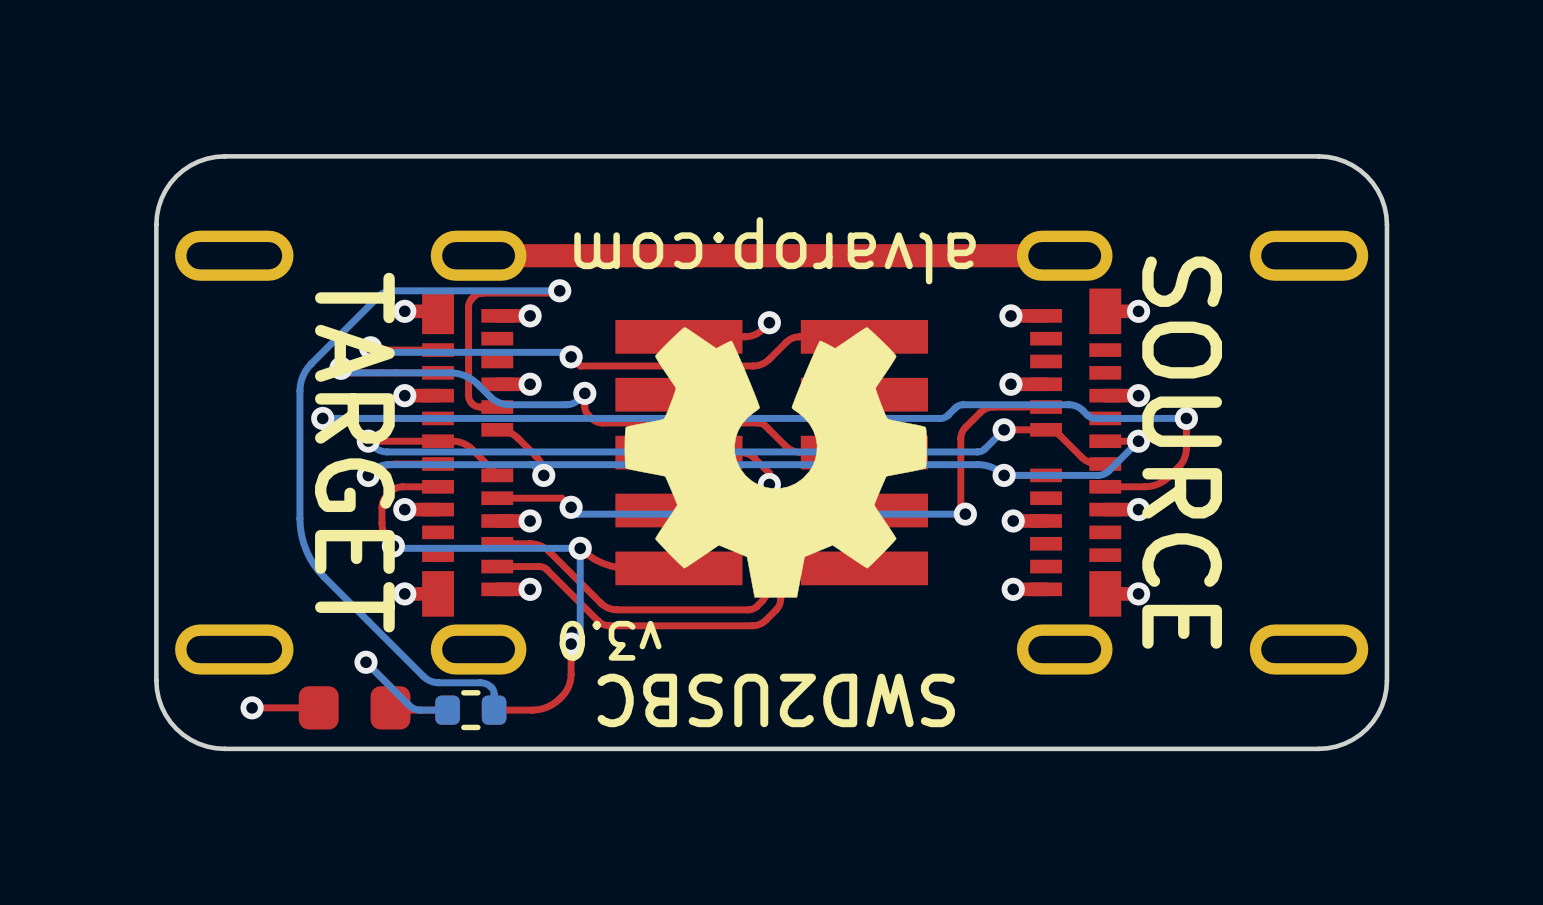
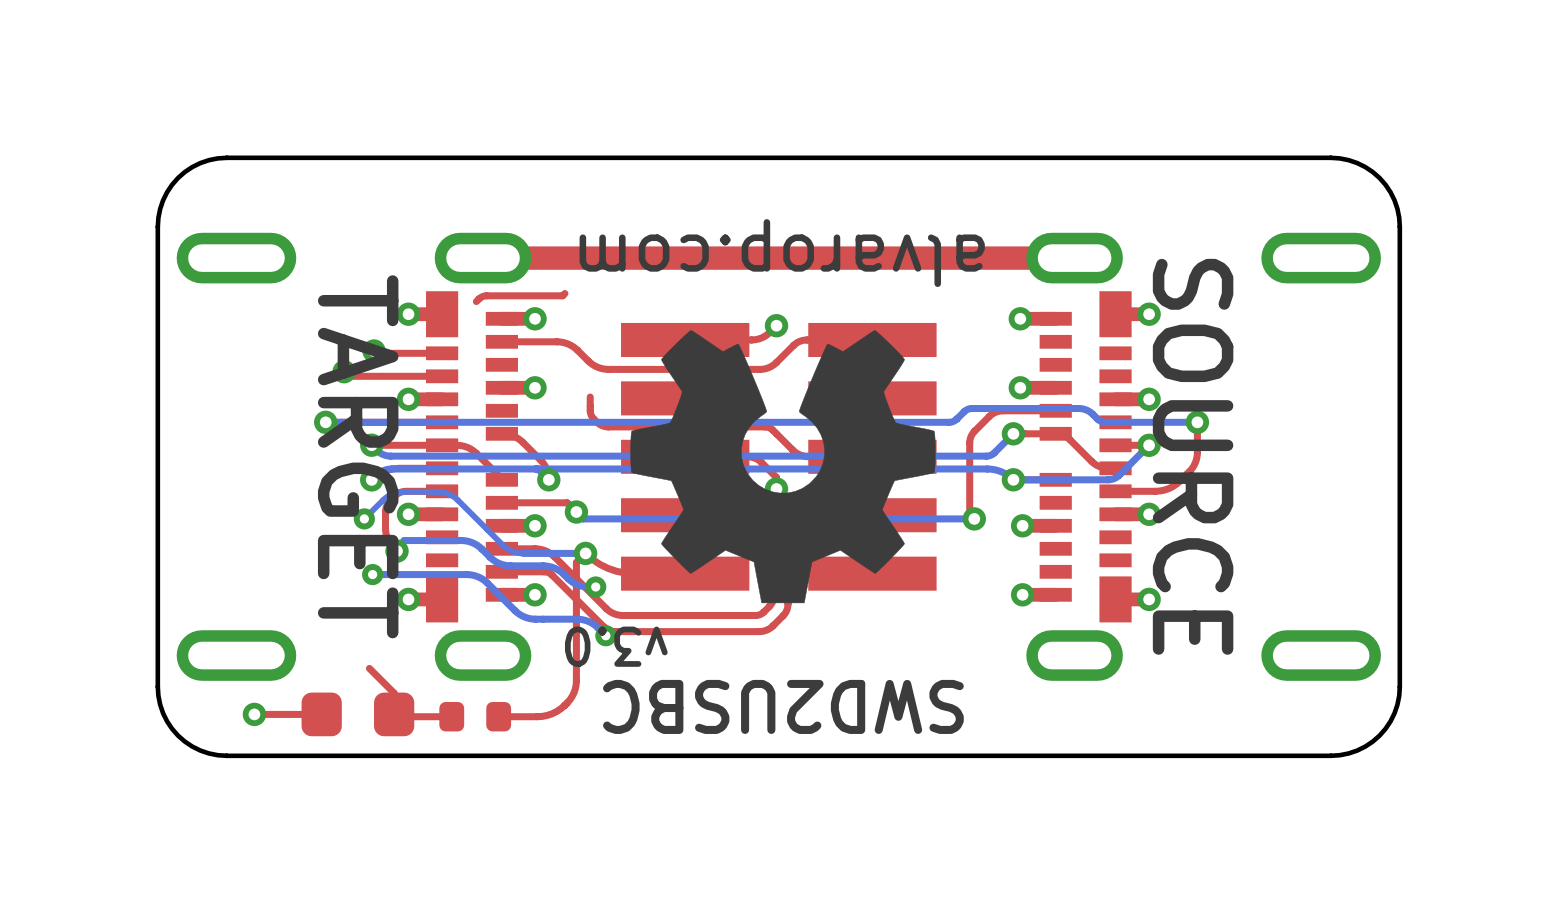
bottom track: (559, 290) (384, 292) (311, 363) (305, 371) (300, 386) (300, 526) (303, 542) (309, 557) (324, 577) (425, 678) (436, 682) (486, 683) (493, 691) (494, 710) -> none
via: (559, 290) -> none
top track: (471, 298) (468, 306) (468, 398) (471, 403) (477, 406) (497, 407) -> none
bottom track: (370, 347) (375, 352) (566, 352) (571, 356) -> none
top track: (571, 356) (580, 366) (603, 366) -> (501, 341) (565, 343) (575, 348) (592, 364) (608, 369)
via: (571, 356) -> none
bottom track: (340, 368) (351, 372) (457, 373) (471, 379) (492, 399) (505, 404) (568, 404) (576, 401) (584, 393) -> none
via: (584, 393) -> none
via: none -> (364, 518)
bottom track: none -> (398, 546) (404, 540) (466, 541) (477, 545) (492, 559) (502, 564) (548, 566) (559, 570) (577, 584) (595, 586)
bottom track: (393, 546) (395, 548) (518, 548) -> (364, 518) (385, 498) (395, 493) (443, 492) (455, 498) (504, 546) (512, 551) (523, 553)
top track: none -> (585, 553) (576, 562) (576, 650)
bottom track: (580, 548) (580, 634) (571, 644) -> none
bottom track: none -> (372, 574) (475, 575) (485, 581) (514, 610) (524, 616) (535, 619) (582, 619) (593, 624) (605, 635)
via: none -> (372, 574)
via: none -> (595, 586)
via: none -> (605, 635)
via: (571, 644) -> none
bottom track: (366, 662) (412, 707) (420, 710) (447, 710) -> none
via: (366, 662) -> none
part: (470, 710) -> none

